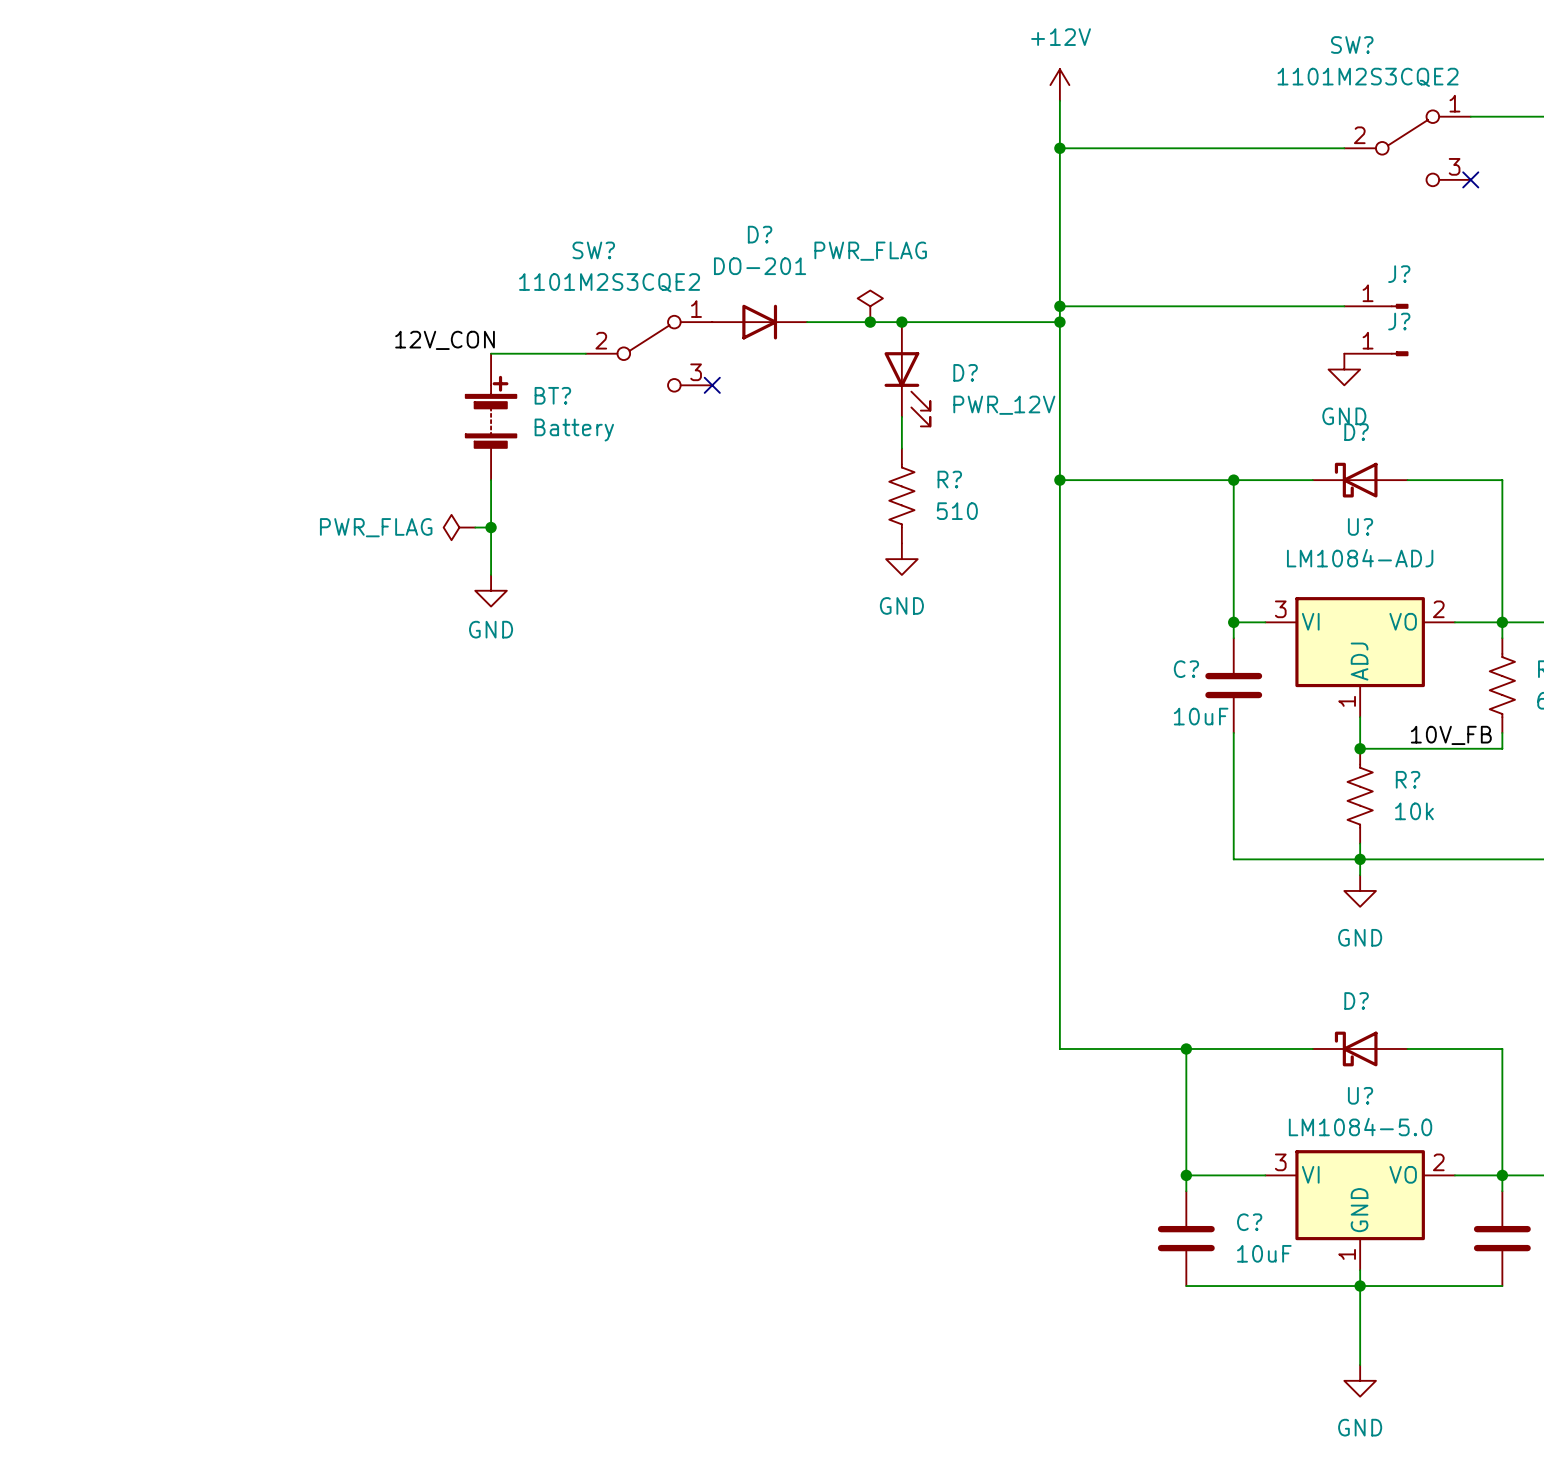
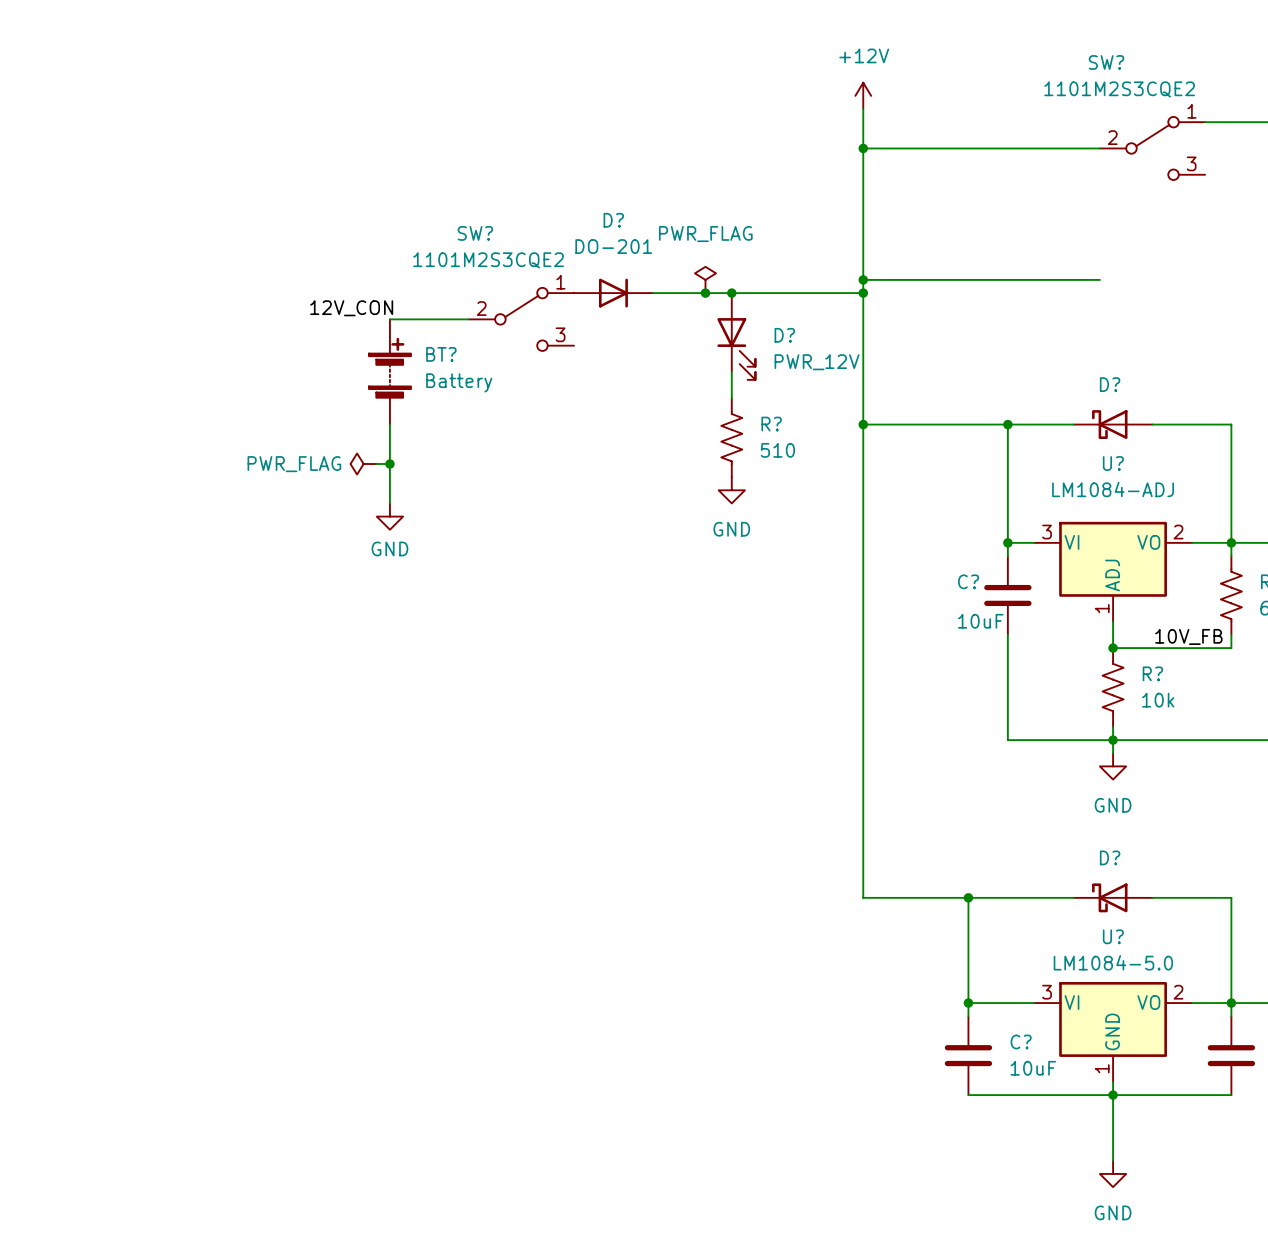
no-connect mark: (1470, 179) -> none
J?: (1376, 306) -> none
J?: (1376, 353) -> none
power symbol: GND (1344, 369) -> none
no-connect mark: (712, 385) -> none

